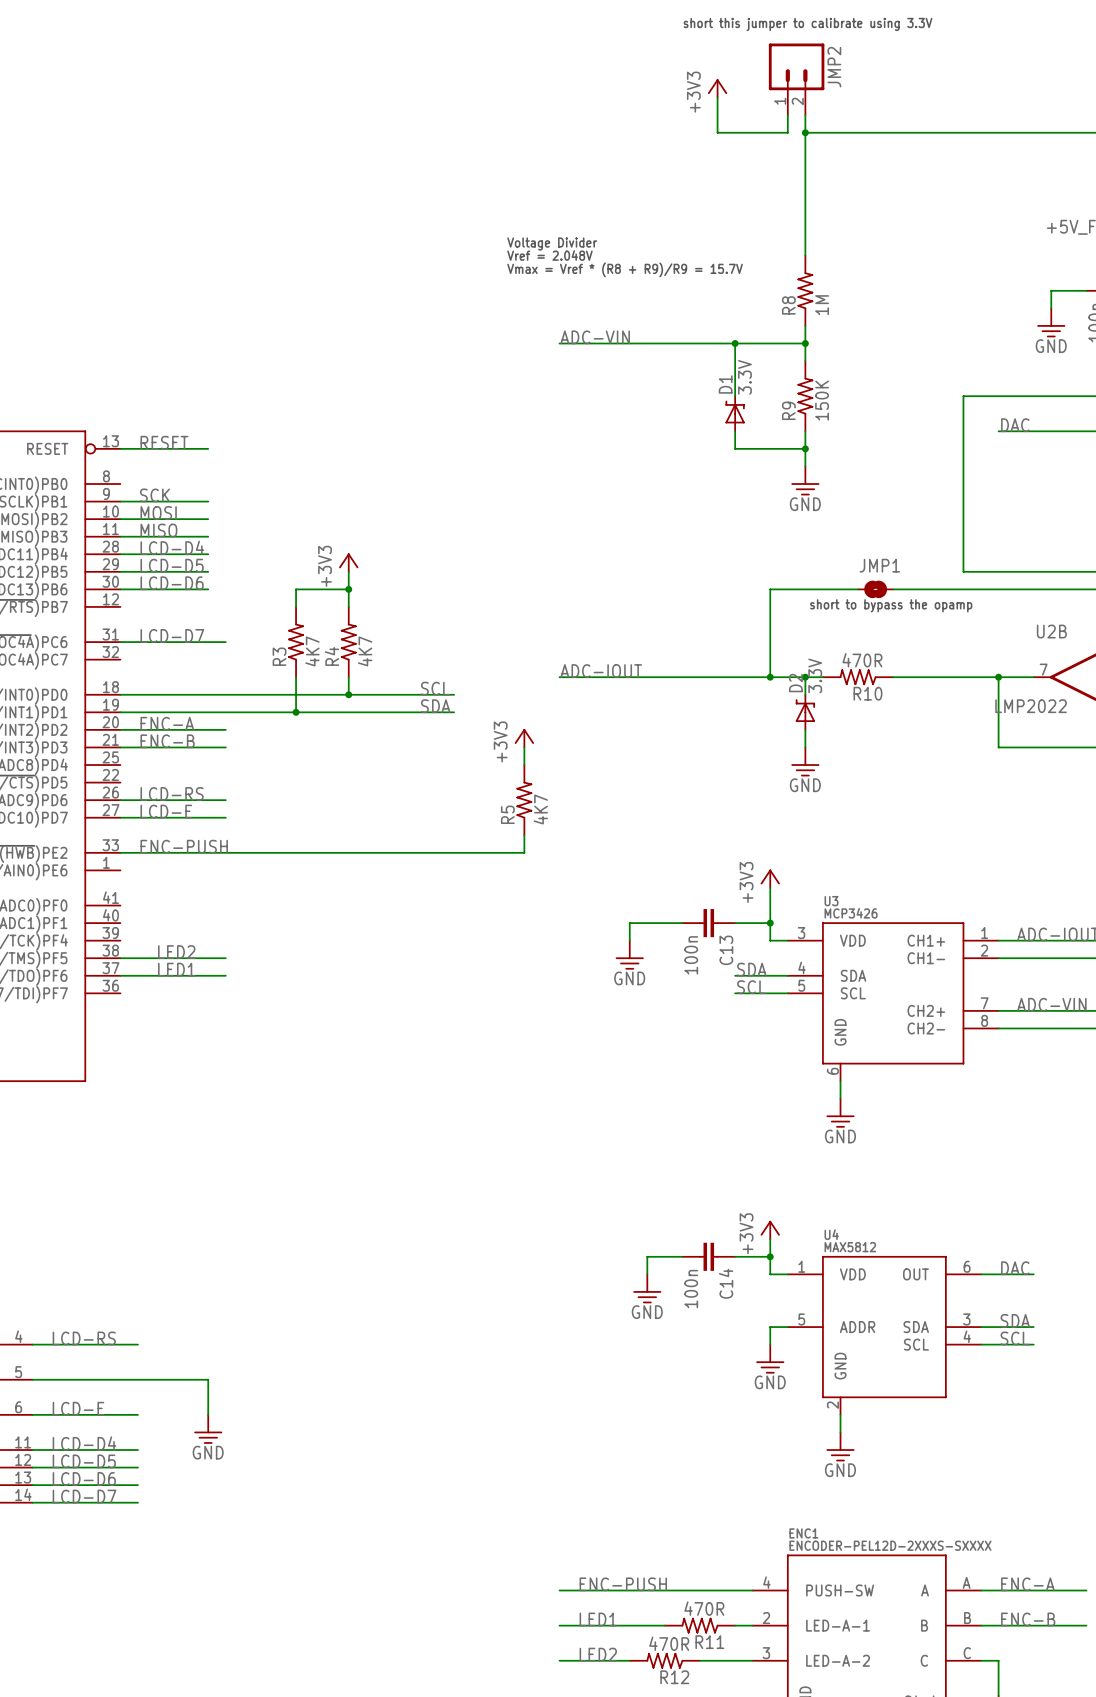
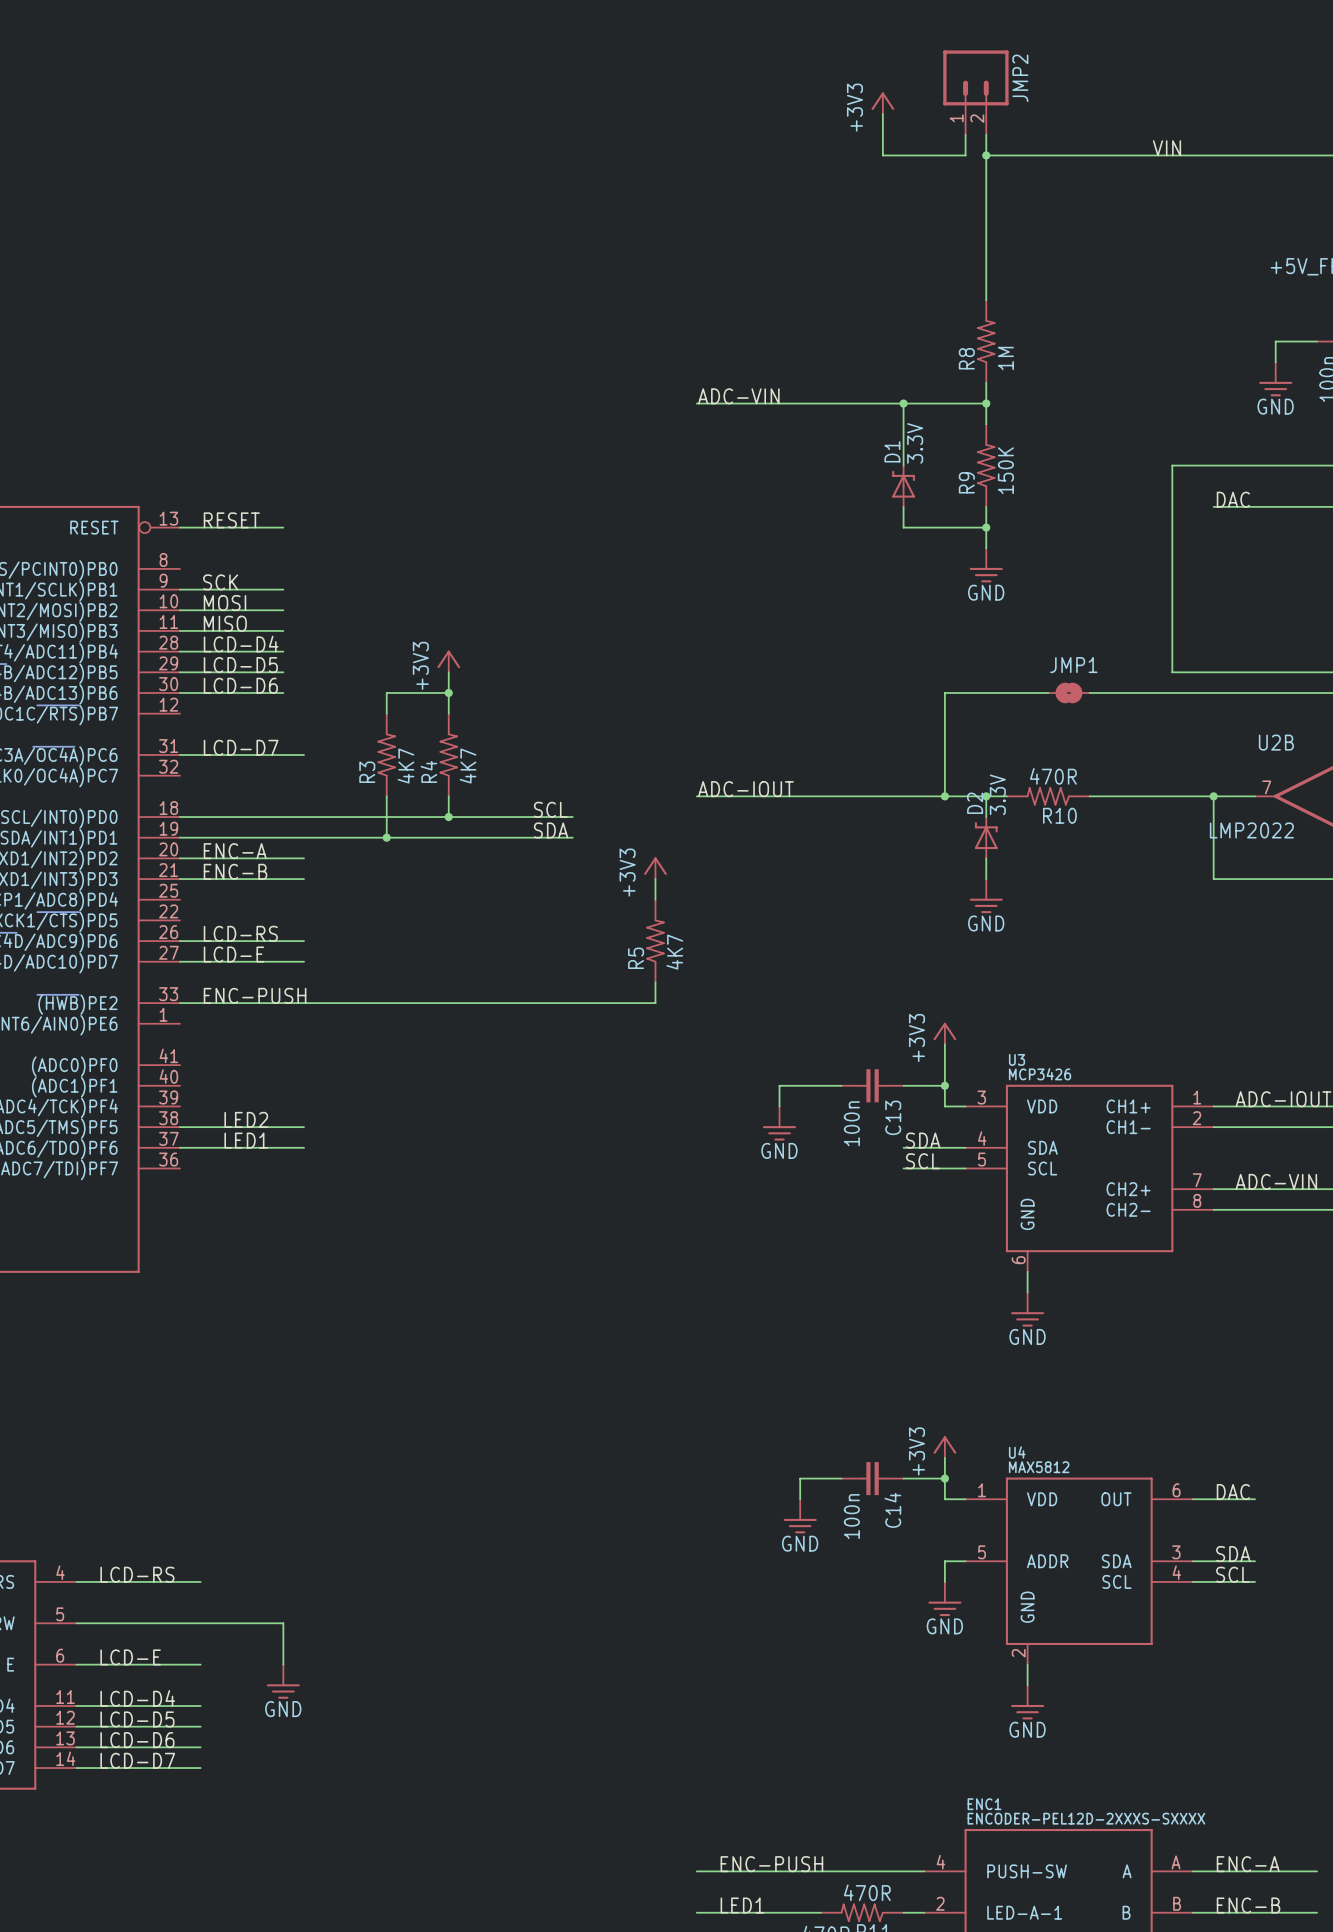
text: short this jumper to calibrate using 3.3V (808, 24) -> none
label: none -> VIN (1166, 148)
text: Voltage Divider (552, 243) -> none
text: Vref = 2.048V (549, 255) -> none
text: Vmax = Vref * (R8 + R9)/R9 = 15.7V (625, 269) -> none
text: short to bypass the opamp (891, 605) -> none

